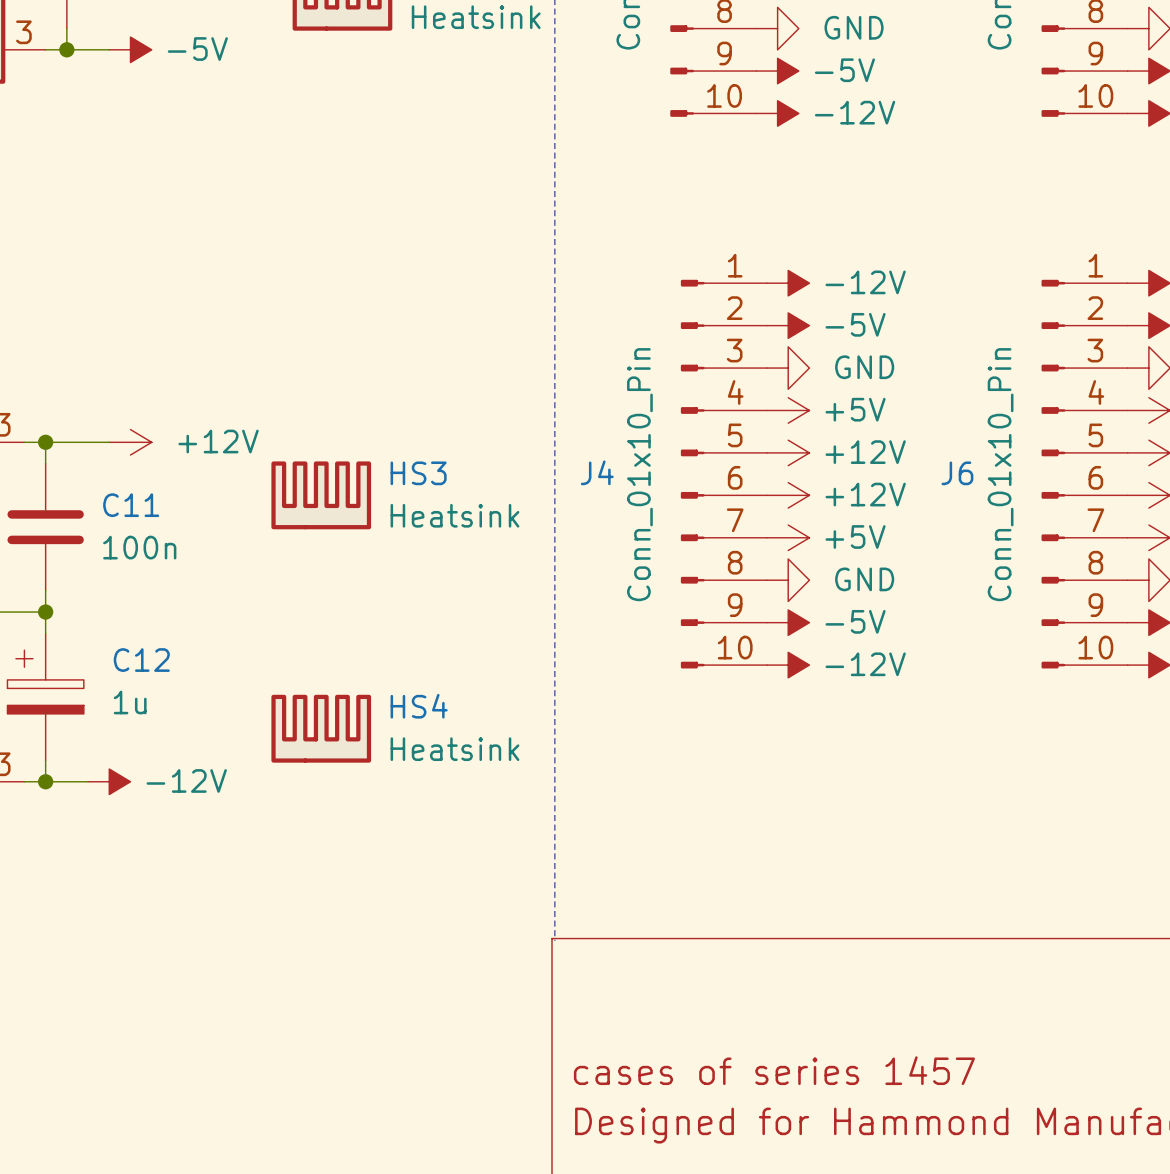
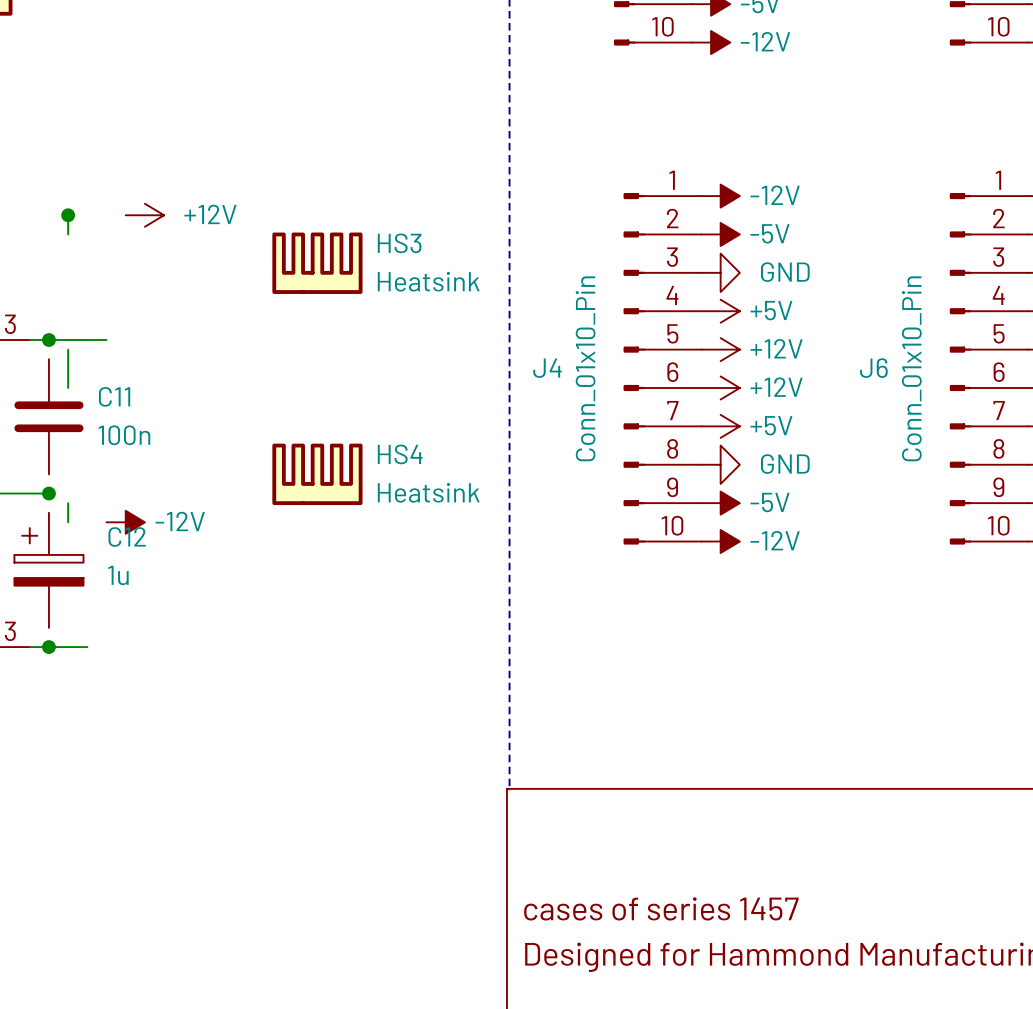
junction: none -> (68, 215)
wire: (45, 442) (45, 463) -> (68, 215) (68, 234)
power symbol position: +12V (130, 442) -> +12V (144, 215)
HS3 position: (321, 495) -> (317, 263)
wire: (45, 590) (45, 633) -> (68, 349) (68, 387)
HS4 position: (321, 728) -> (317, 474)
wire: (45, 760) (45, 781) -> (68, 503) (68, 522)
power symbol position: -12V (109, 781) -> -12V (125, 522)

